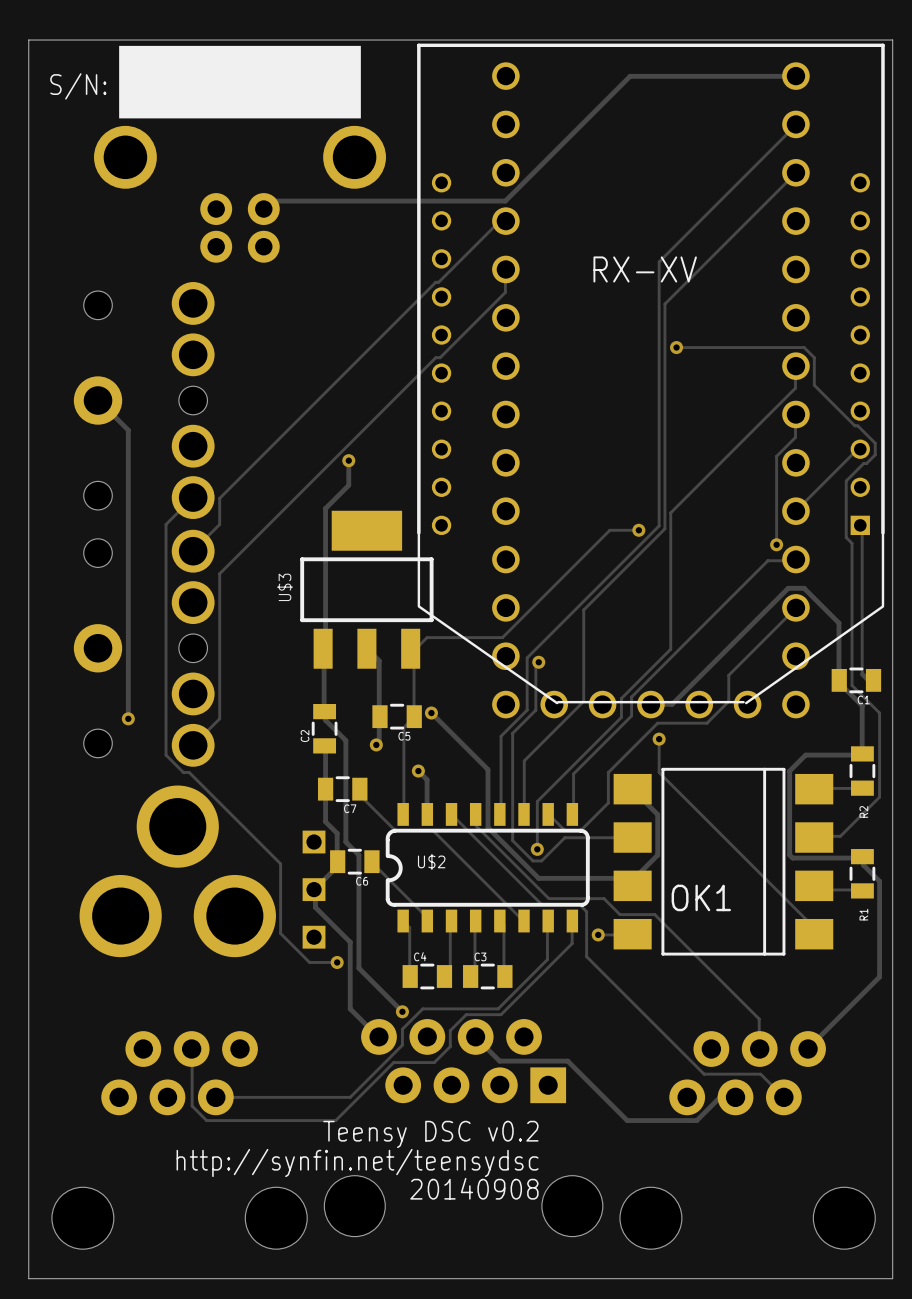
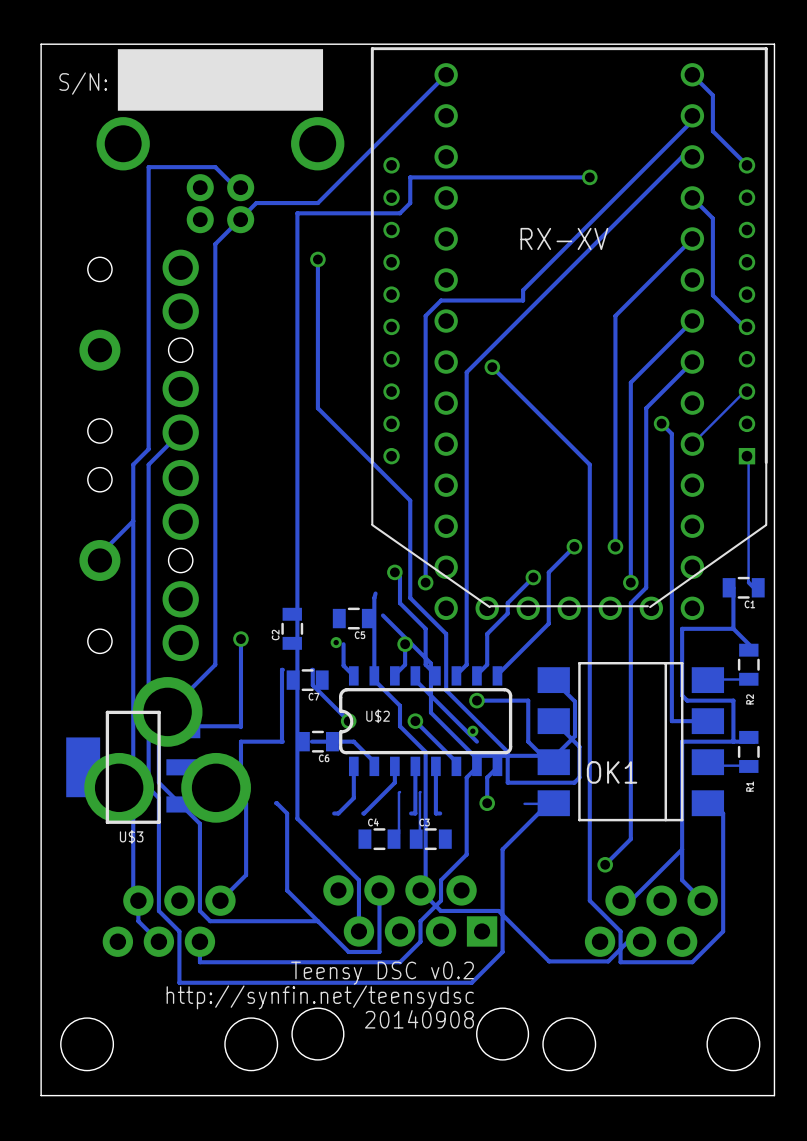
track: none -> (446, 74) (317, 203) (256, 203) (215, 244) (215, 664) (158, 721) (158, 782) (179, 803) (183, 804) (184, 808) (199, 823) (199, 910) (210, 921) (317, 921)
track: (795, 76) (630, 76) (505, 201) (271, 201) (263, 209) -> (692, 74) (712, 95) (712, 131) (746, 165)
track: (795, 124) (659, 261) (659, 525) (527, 657) (527, 710) (501, 736) (499, 814) -> (692, 115) (692, 120) (523, 290) (523, 300) (441, 300) (425, 315) (425, 582)
track: (795, 172) (664, 304) (664, 528) (583, 610) (583, 701) (524, 760) (524, 814) -> (692, 156) (682, 156) (466, 372) (466, 664) (456, 675)
track: none -> (589, 177) (410, 177) (410, 203) (399, 213) (297, 213) (297, 818) (358, 880) (358, 931)
via: none -> (589, 177)
track: none -> (240, 187) (235, 187) (215, 167) (148, 167) (148, 449) (133, 464) (133, 895) (138, 900) (138, 921) (158, 941)
track: (505, 221) (499, 221) (438, 282) (435, 282) (219, 498) (219, 524) (193, 551) -> none
track: none -> (692, 197) (712, 218) (712, 295) (743, 326) (746, 326)
track: (505, 269) (505, 292) (440, 357) (435, 357) (219, 573) (219, 718) (193, 745) -> none
track: none -> (692, 238) (615, 315) (615, 546)
via: none -> (317, 259)
track: (676, 347) (804, 347) (814, 357) (814, 385) (875, 443) (875, 454) (846, 480) (846, 537) (852, 543) (852, 685) (879, 713) (879, 797) (840, 836) (814, 837) -> (661, 423) (671, 433) (671, 721) (707, 721)
via: (676, 347) -> none
track: (795, 366) (795, 388) (670, 512) (670, 649) (621, 698) (621, 717) (537, 801) (537, 849) -> (692, 321) (630, 382) (630, 582)
track: (98, 400) (128, 430) (128, 718) -> none
track: (795, 414) (795, 437) (776, 456) (776, 544) -> (692, 362) (646, 408) (646, 587) (630, 603) (630, 839) (605, 864)
via: none -> (492, 367)
track: (348, 460) (348, 485) (325, 508) (324, 711) (325, 720) (345, 740) (345, 842) (358, 855) (358, 968) (402, 1011) -> none
via: (348, 460) -> none
via: none -> (661, 423)
track: (193, 497) (166, 524) (166, 755) (183, 772) (189, 772) (280, 863) (280, 933) (309, 962) (337, 962) -> (180, 432) (148, 464) (148, 787) (158, 798) (158, 910) (179, 931) (179, 982) (471, 982) (502, 951) (502, 849) (548, 803) (553, 803)
track: (638, 530) (609, 530) (502, 637) (427, 637) (414, 650) (410, 648) (414, 652) (414, 716) (403, 727) (403, 814) -> none
via: (638, 530) -> none
via: (776, 544) -> none
track: (795, 559) (767, 560) (631, 697) (631, 715) (573, 773) (572, 814) -> none
U$3 rotation: 0° (366, 589) -> 90° counterclockwise (133, 767)
U$3 position: (366, 589) -> (133, 767)
track: none -> (133, 521) (102, 551) (99, 560)
track: (795, 607) (728, 675) (728, 701) (707, 723) (657, 723) (608, 772) (608, 802) (580, 830) (564, 830) (548, 814) -> none
track: none -> (574, 546) (548, 572) (548, 623) (497, 675)
via: none -> (574, 546)
via: none -> (615, 546)
track: (366, 648) (379, 660) (379, 742) (376, 744) -> none
track: none -> (394, 572) (399, 577) (399, 603) (425, 628) (425, 664) (435, 675)
via: none -> (394, 572)
track: (538, 662) (535, 665) (535, 710) (512, 733) (512, 840) (532, 860) (541, 860) (564, 837) (632, 837) -> (317, 259) (317, 408) (410, 500) (410, 598) (446, 633) (446, 690) (507, 751) (507, 782) (574, 782) (579, 777) (579, 746) (553, 721)
via: (538, 662) -> none
track: none -> (533, 577) (507, 603) (507, 613) (487, 633) (487, 664) (476, 675)
via: none -> (533, 577)
via: none -> (425, 582)
via: none -> (630, 582)
track: none -> (729, 587) (733, 587) (733, 628)
track: none -> (375, 593) (374, 680) (399, 705) (399, 726) (425, 751) (425, 885) (420, 890)
track: (650, 704) (672, 704) (788, 588) (804, 588) (838, 623) (839, 680) (840, 684) (862, 705) (862, 753) -> (733, 628) (753, 649) (748, 650)
via: (431, 713) -> none
via: (128, 718) -> none
track: none -> (733, 628) (682, 628) (682, 695) (687, 700) (733, 700) (733, 741)
track: (659, 739) (659, 772) (812, 926) (814, 934) -> (492, 367) (589, 464) (589, 900) (620, 931) (620, 962) (692, 962) (723, 931) (723, 813) (712, 803) (707, 803)
via: (659, 739) -> none
track: none -> (240, 639) (240, 727)
via: none -> (240, 639)
track: (324, 745) (325, 821) (337, 833) (337, 861) (337, 866) (314, 889) (315, 907) (350, 942) (350, 1008) (378, 1036) -> none
track: none -> (343, 644) (343, 665) (353, 675) (353, 680)
track: none -> (405, 644) (405, 664) (394, 675)
via: none -> (405, 644)
track: (862, 753) (805, 755) (789, 771) (789, 855) (792, 858) (862, 856) (863, 865) (879, 881) (879, 976) (808, 1049) -> (748, 737) (753, 741) (682, 741) (682, 880) (702, 900)
track: (418, 771) (427, 779) (427, 814) -> none
via: (418, 771) -> none
track: none -> (282, 669) (282, 741)
track: none -> (311, 669) (312, 685) (348, 721)
track: none -> (415, 675) (415, 680) (476, 741)
track: (359, 789) (360, 795) (395, 830) (432, 830) (524, 921) -> none
track: none -> (476, 700) (528, 700) (528, 741) (548, 762) (553, 762)
via: none -> (476, 700)
track: (451, 814) (541, 904) (579, 904) (586, 911) (586, 956) (704, 1074) (760, 1074) (783, 1097) -> none
track: (475, 814) (476, 826) (548, 898) (604, 898) (619, 914) (654, 914) (759, 1019) (759, 1049) -> none
via: none -> (348, 721)
track: none -> (415, 721) (456, 762) (456, 766)
via: none -> (415, 721)
track: none -> (240, 726) (184, 726) (183, 730)
track: none -> (282, 741) (240, 741) (240, 798) (246, 803) (246, 875) (220, 900)
track: none -> (311, 741) (353, 741) (374, 762) (374, 766)
track: (371, 861) (427, 917) (427, 921) -> none
U$2 position: (487, 867) -> (425, 721)
part: (314, 889) -> none
track: none -> (353, 766) (353, 798) (338, 813) (334, 813)
track: none -> (394, 766) (394, 782) (363, 813)
track: none -> (415, 766) (415, 813) (411, 813)
track: none -> (435, 766) (435, 813) (440, 813)
track: none -> (497, 766) (487, 777) (487, 803)
track: (403, 921) (409, 927) (410, 976) -> none
track: (499, 921) (503, 924) (504, 976) -> none
track: (548, 921) (547, 959) (498, 1008) (422, 1008) (402, 1029) (402, 1045) (350, 1097) (215, 1097) -> (476, 766) (466, 777) (466, 854) (441, 880) (441, 900) (420, 921) (420, 941) (399, 962) (199, 962) (199, 941)
track: (572, 921) (572, 943) (501, 1014) (466, 1014) (450, 1030) (450, 1046) (434, 1062) (393, 1062) (335, 1120) (206, 1120) (192, 1106) (191, 1049) -> none
track: none -> (276, 803) (287, 813) (287, 890) (348, 951) (379, 951) (379, 890)
via: none -> (487, 803)
via: (598, 934) -> none
via: (337, 962) -> none
track: none -> (682, 849) (625, 905)
via: none -> (605, 864)
via: (402, 1011) -> none

